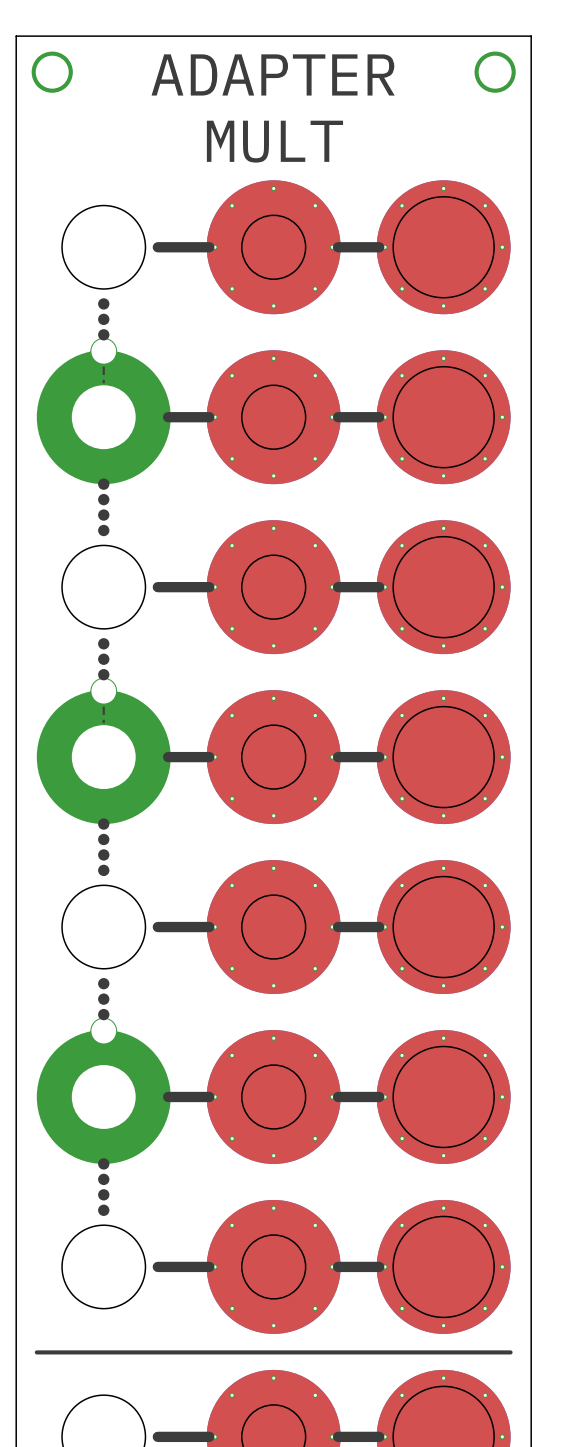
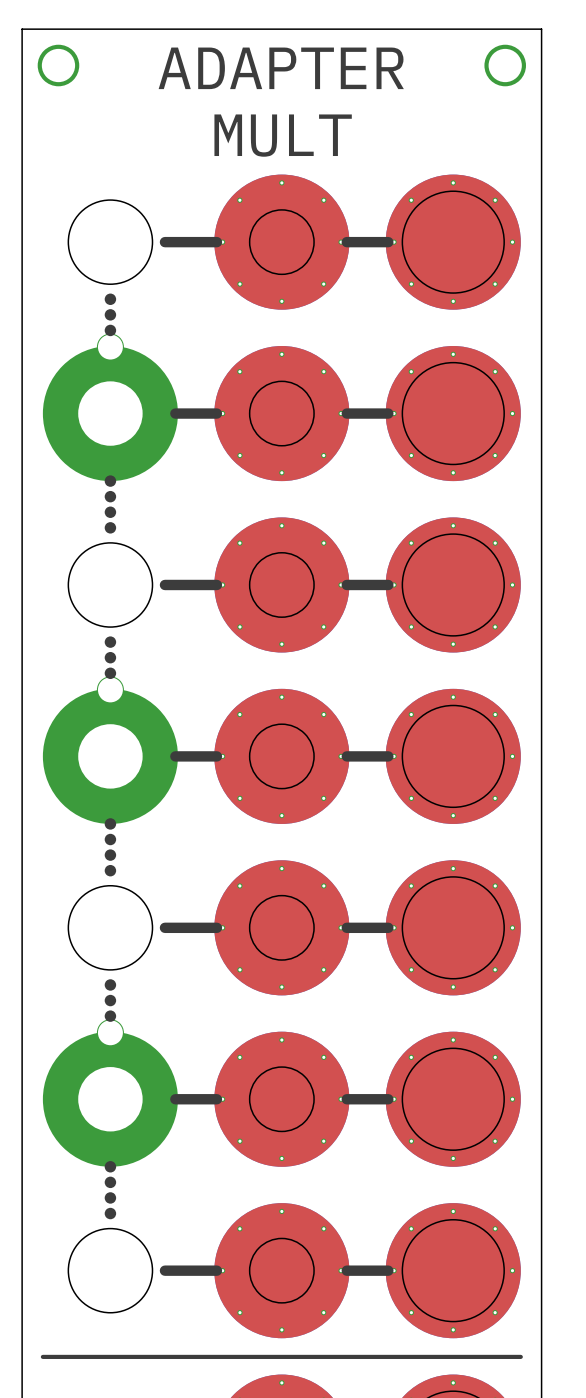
line: (103, 366) (103, 383) -> none
line: (103, 706) (103, 723) -> none

